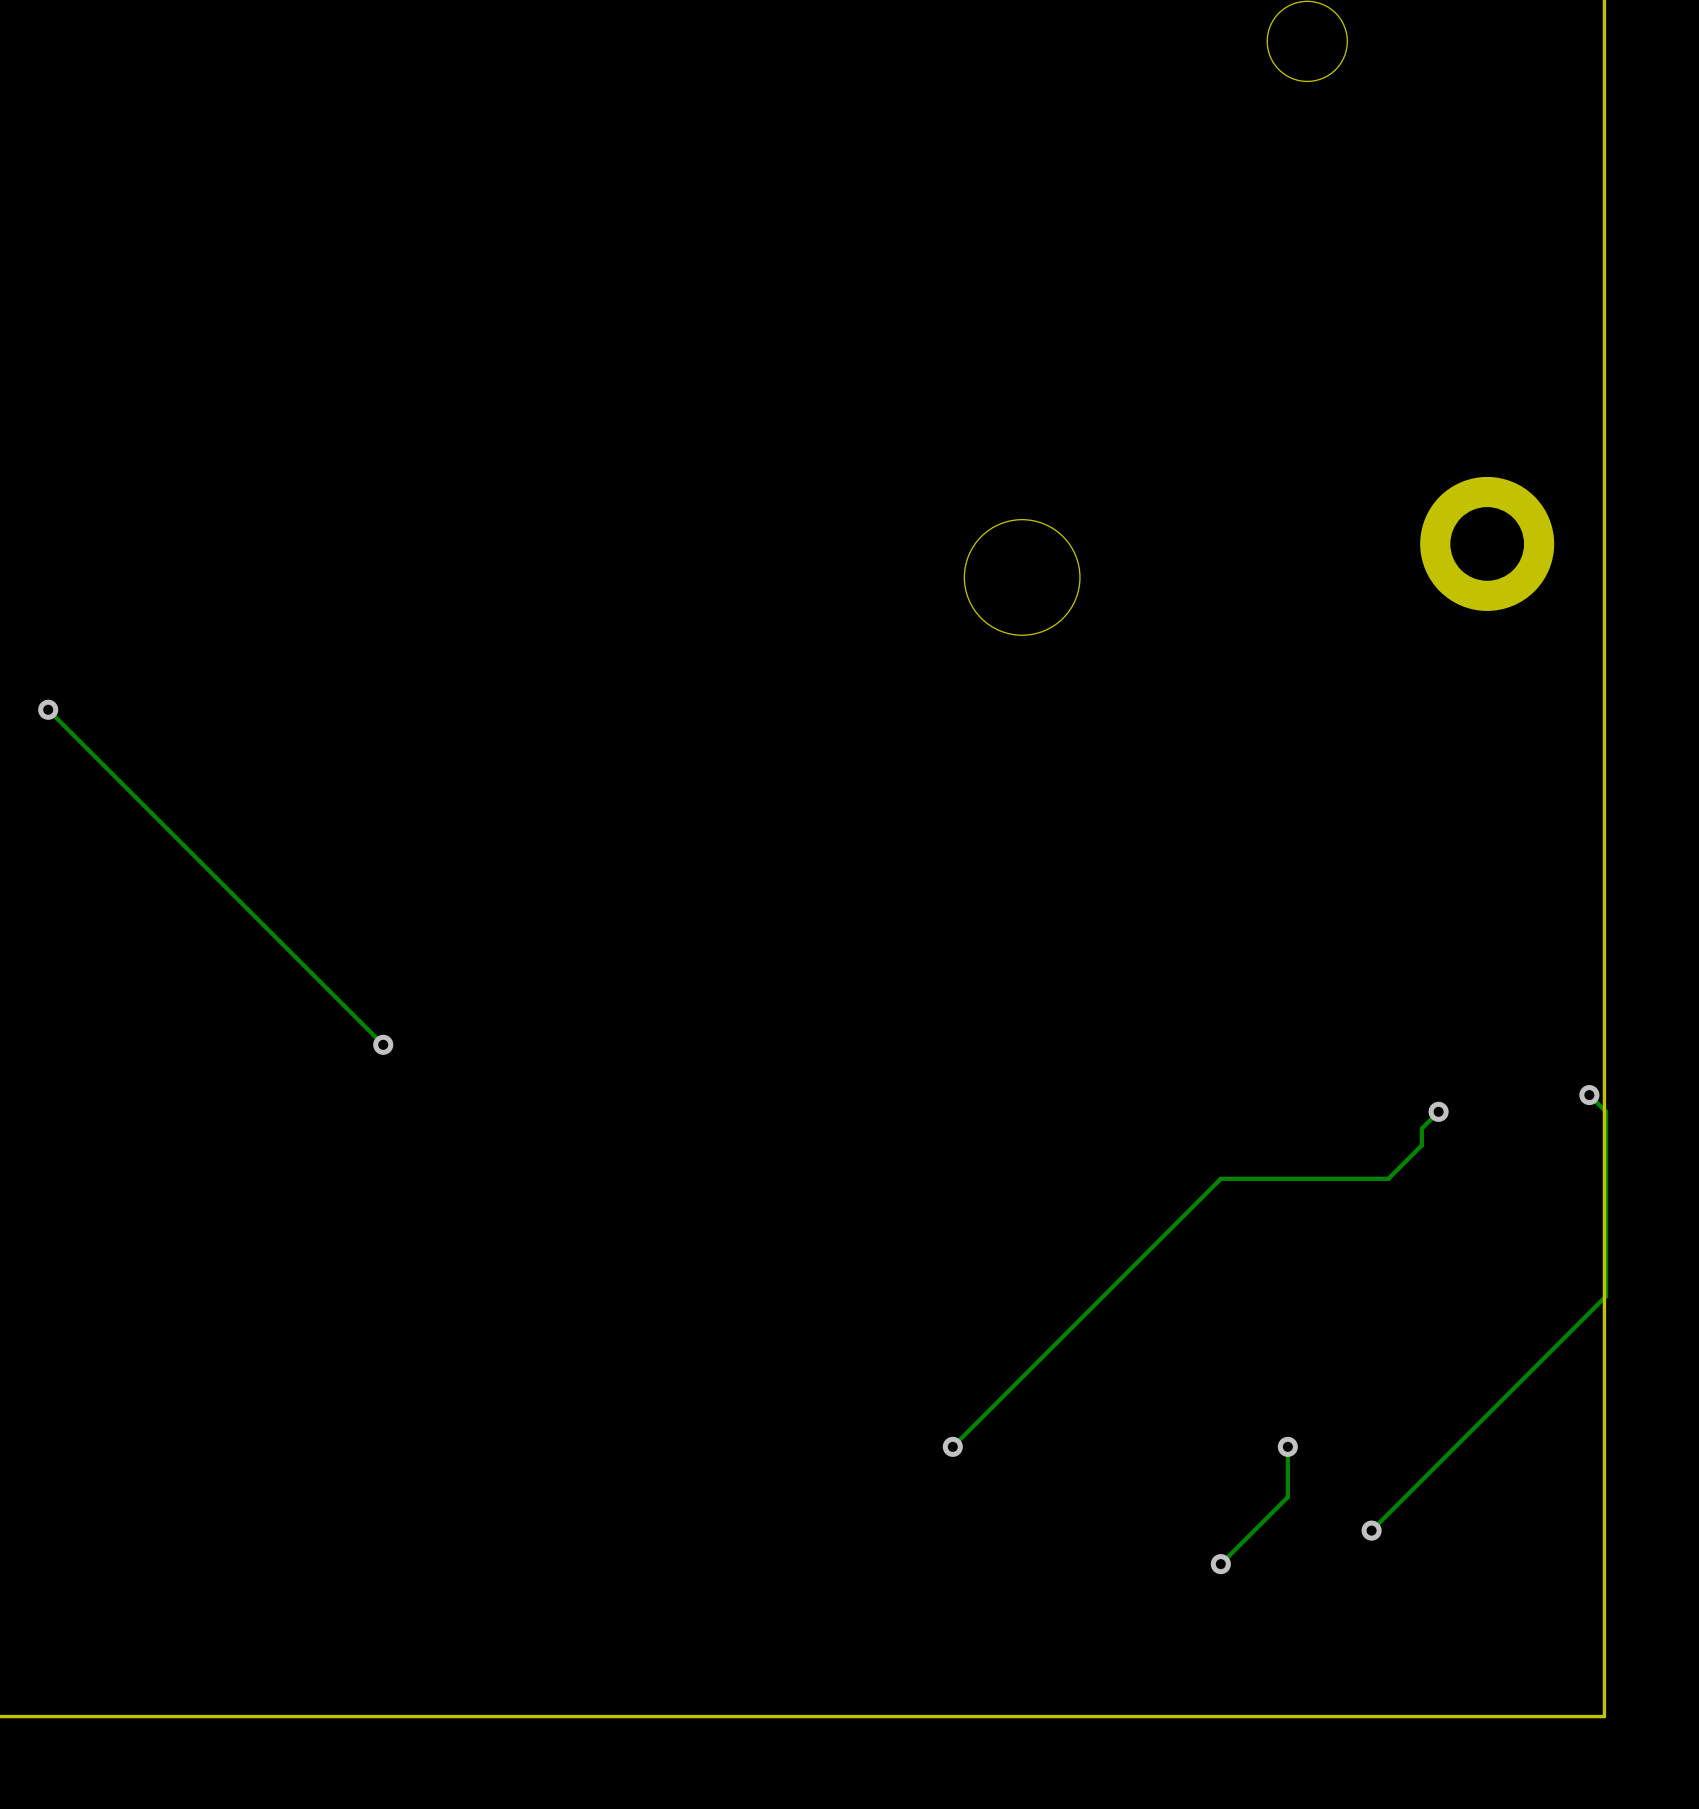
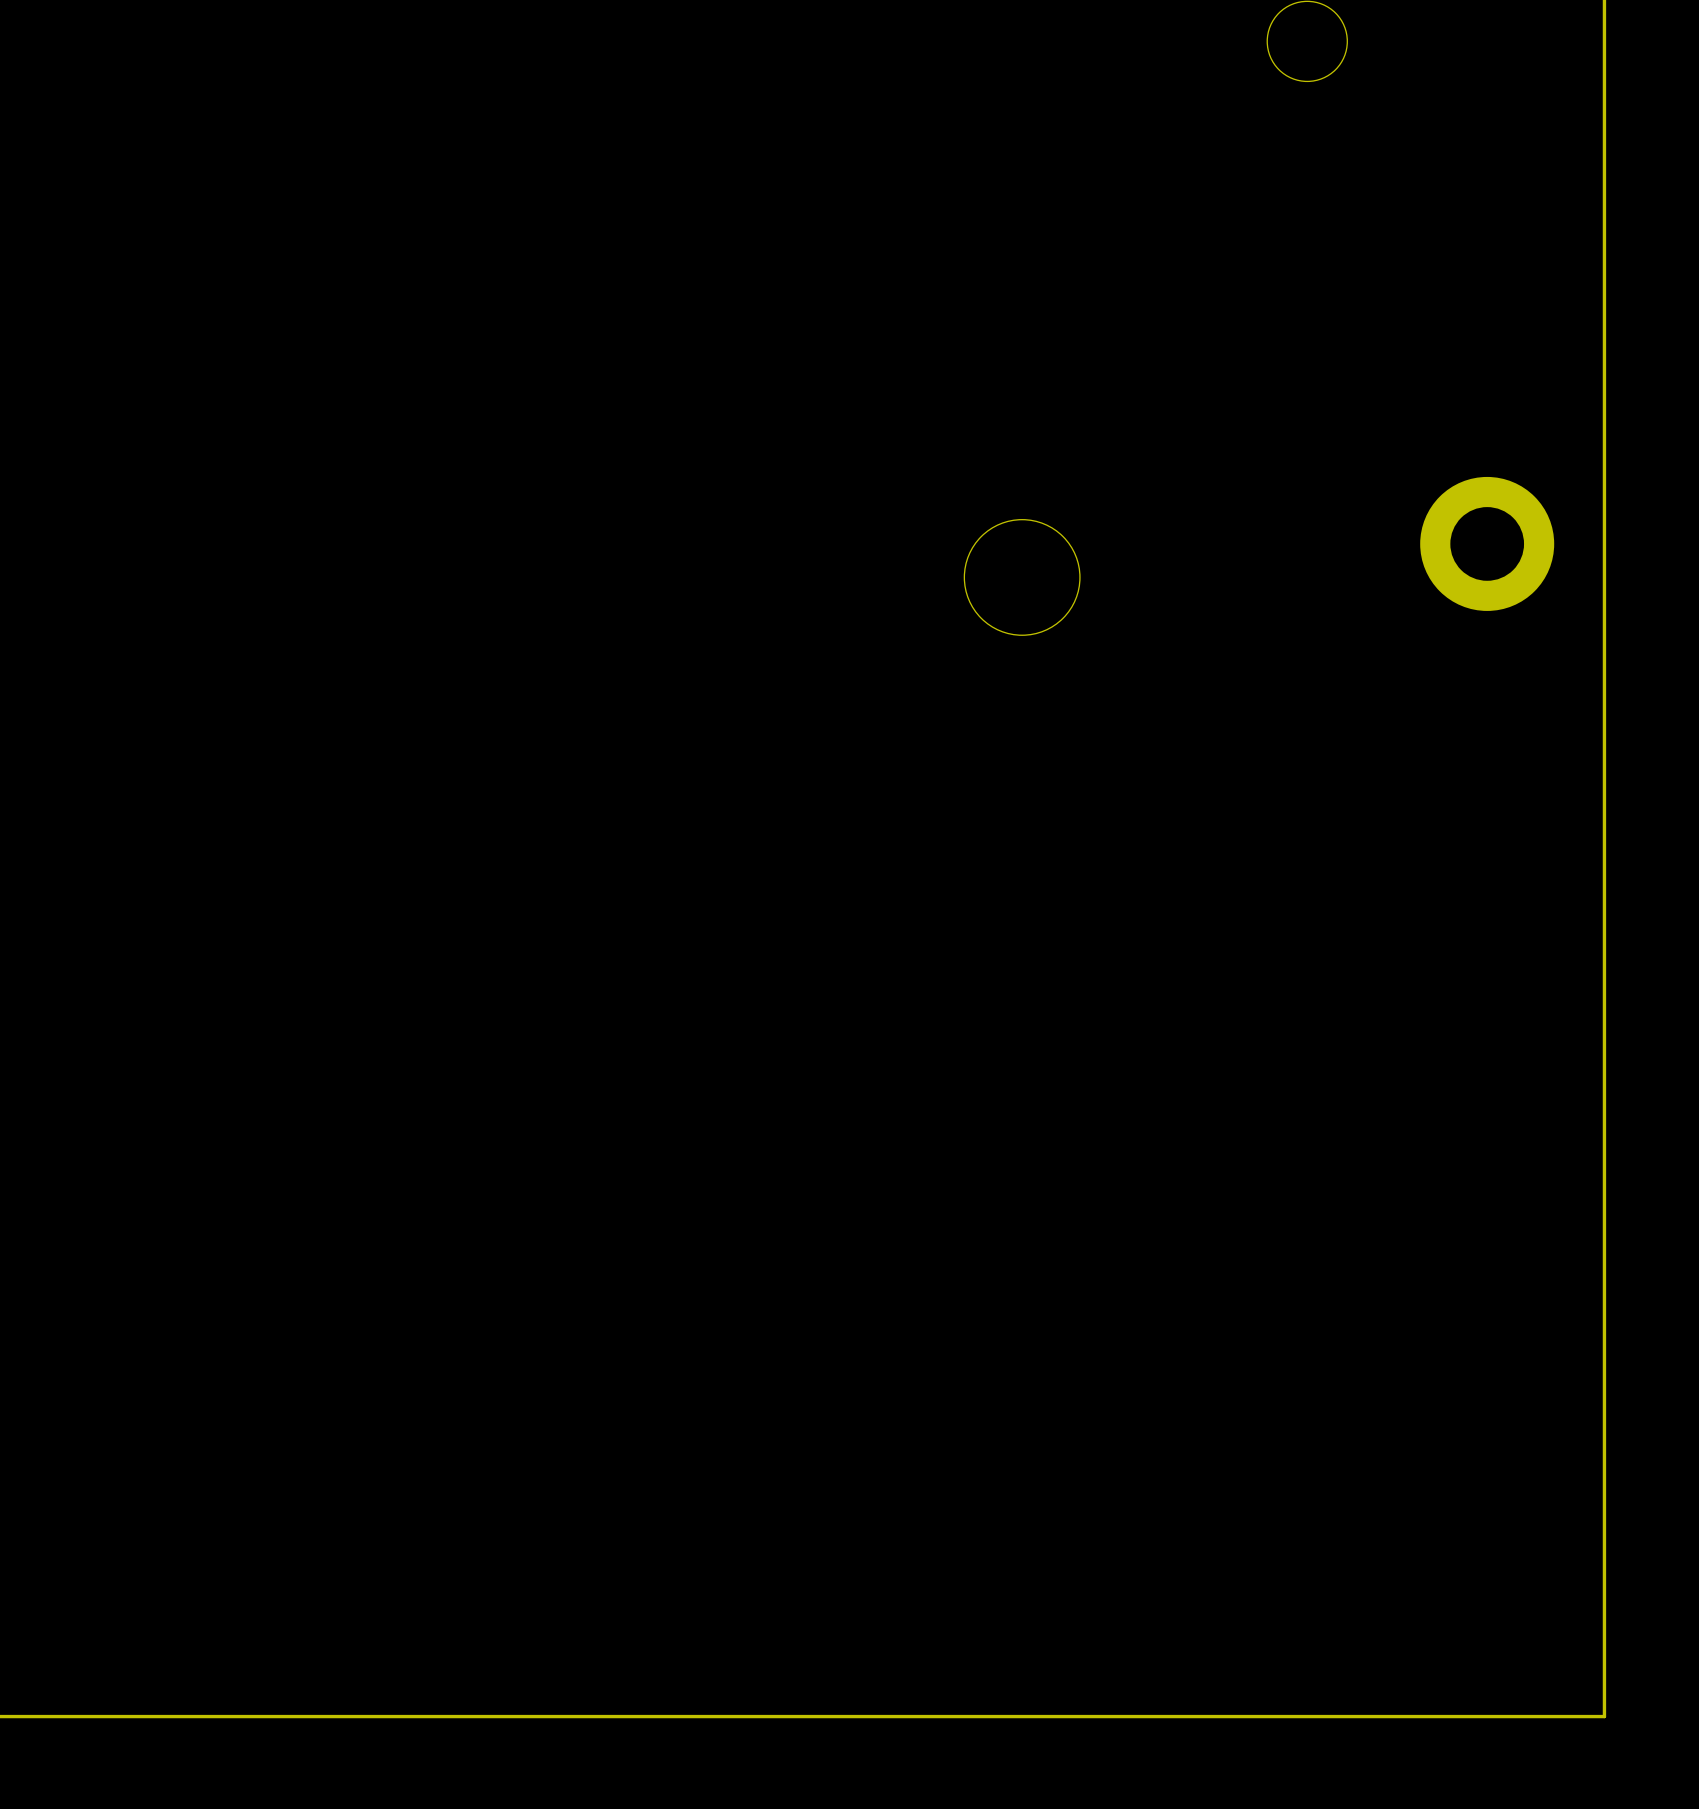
track: (48, 709) (383, 1044) -> none
via: (48, 709) -> none
via: (383, 1044) -> none
track: (1589, 1095) (1606, 1111) (1606, 1296) (1371, 1530) -> none
via: (1589, 1095) -> none
track: (1438, 1111) (1421, 1128) (1421, 1145) (1388, 1178) (1220, 1178) (952, 1446) -> none
via: (1438, 1111) -> none
via: (952, 1446) -> none
track: (1287, 1446) (1287, 1497) (1220, 1564) -> none
via: (1287, 1446) -> none
via: (1371, 1530) -> none
via: (1220, 1564) -> none

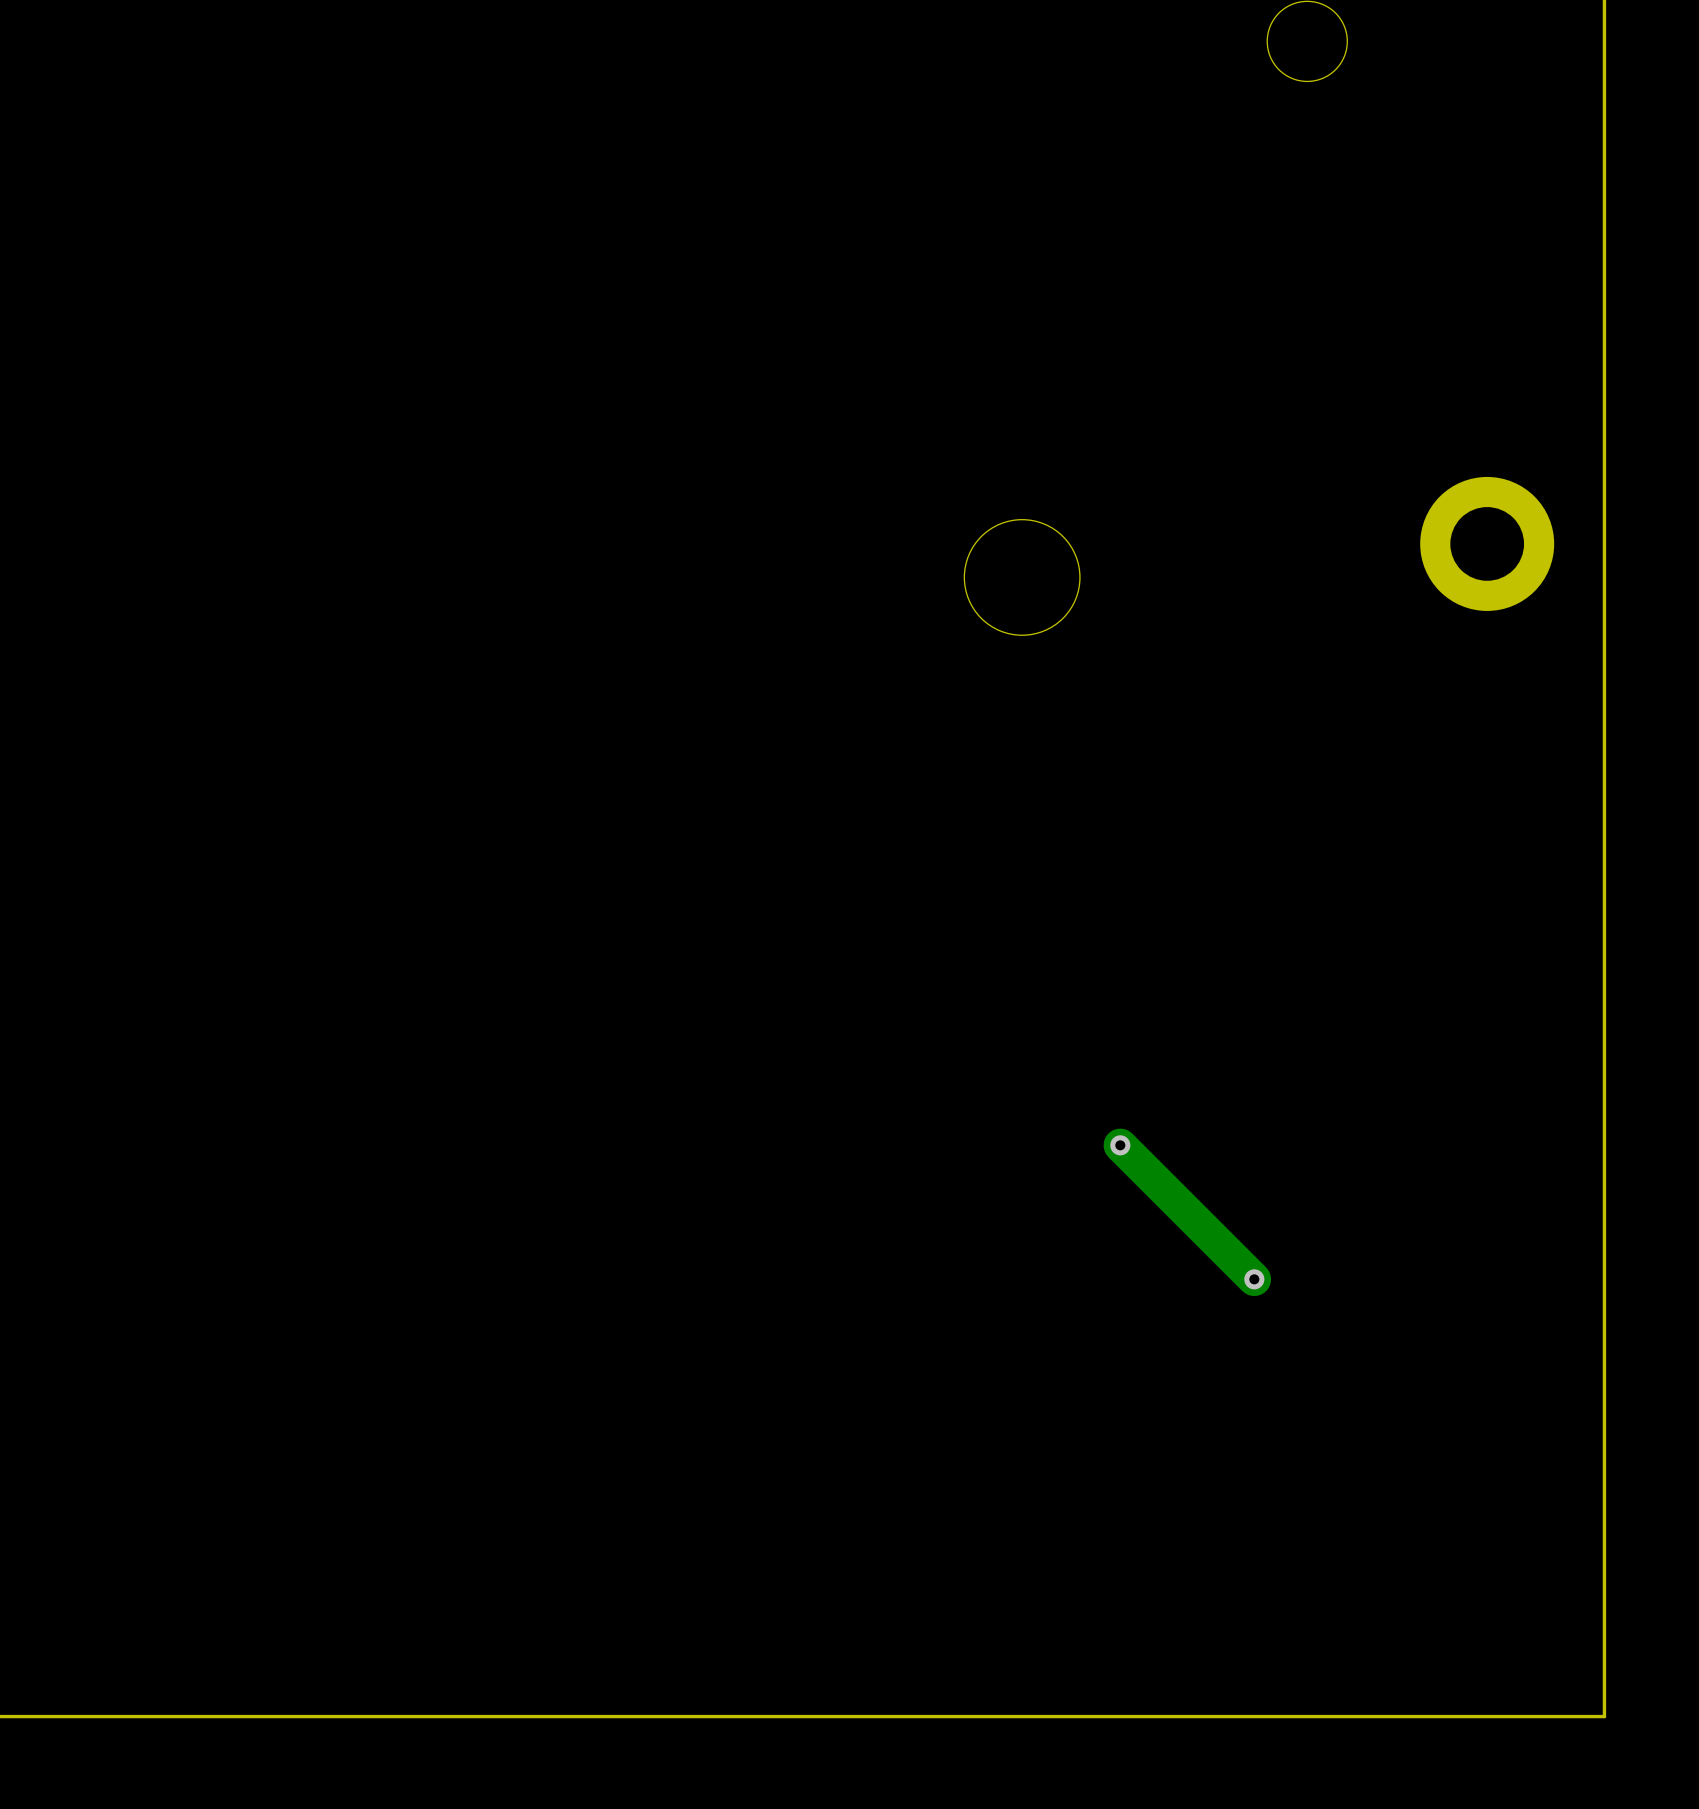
track: none -> (1120, 1145) (1254, 1279)
via: none -> (1120, 1145)
via: none -> (1254, 1279)

